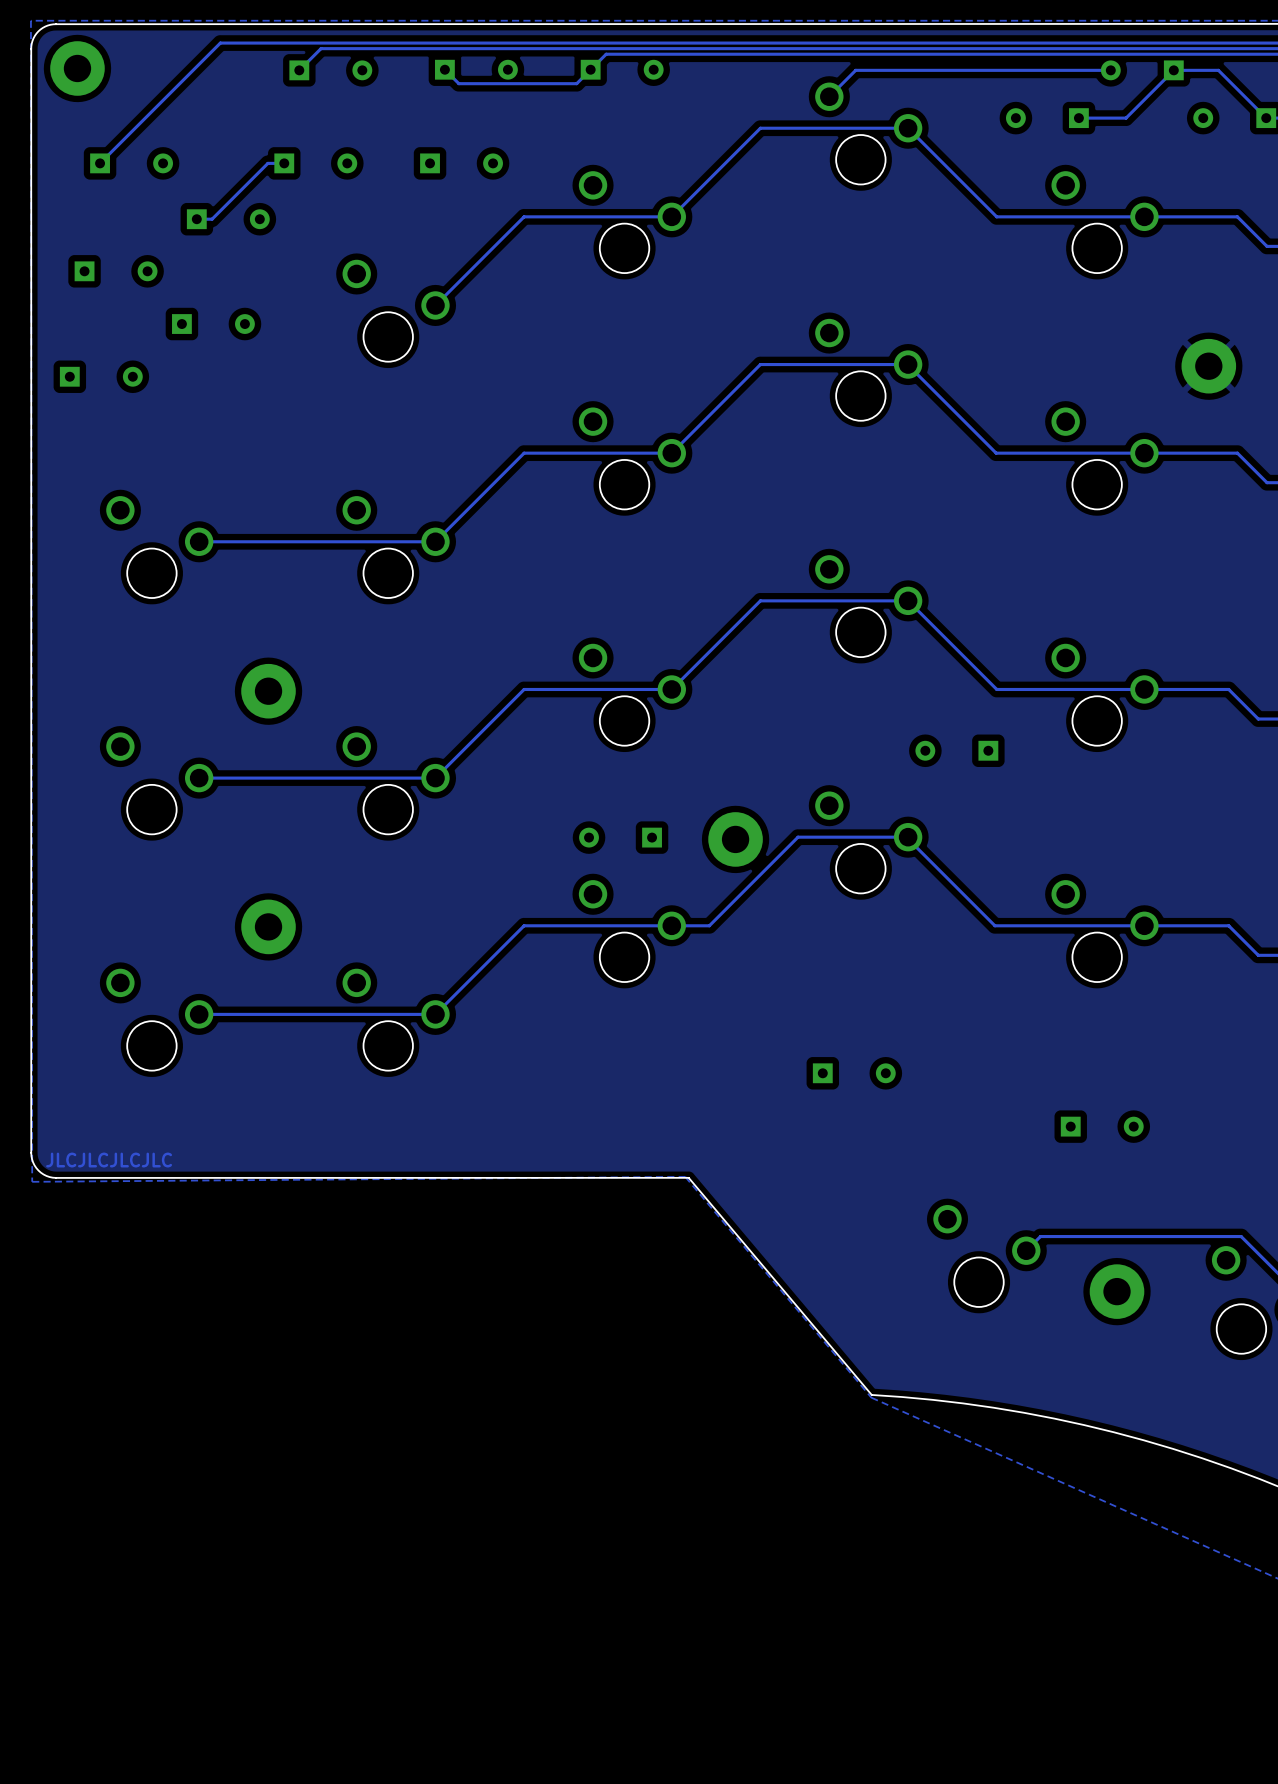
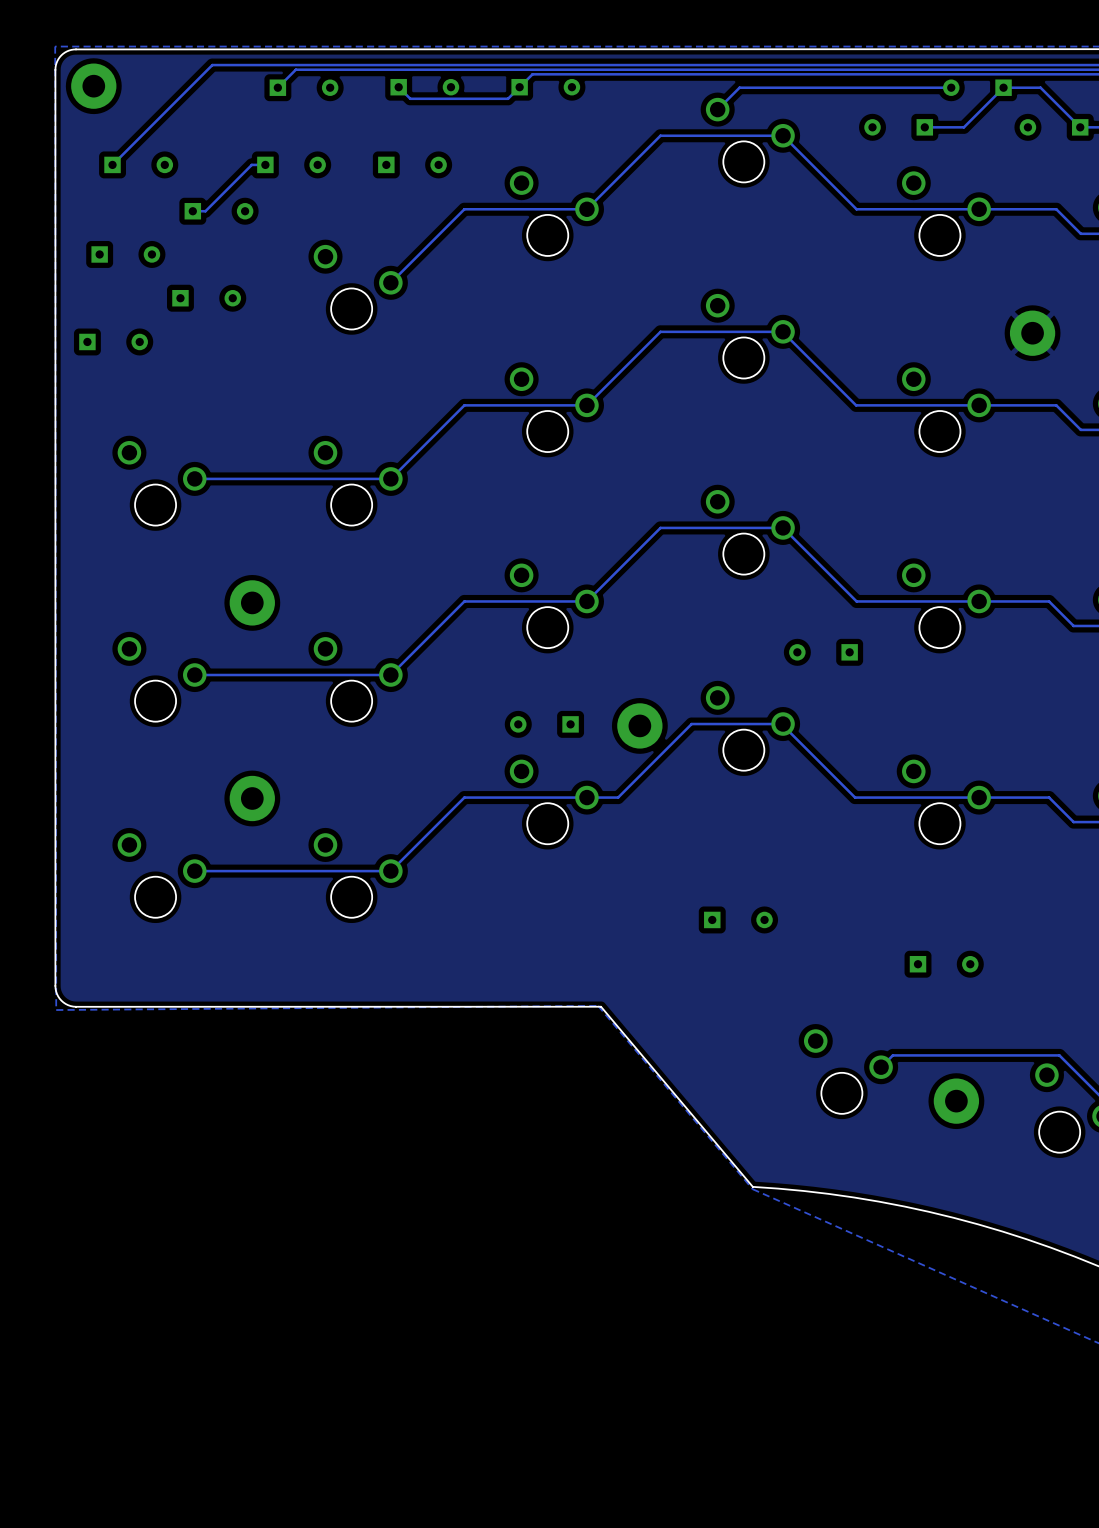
text: JLCJLCJLCJLC (109, 1160) -> none

